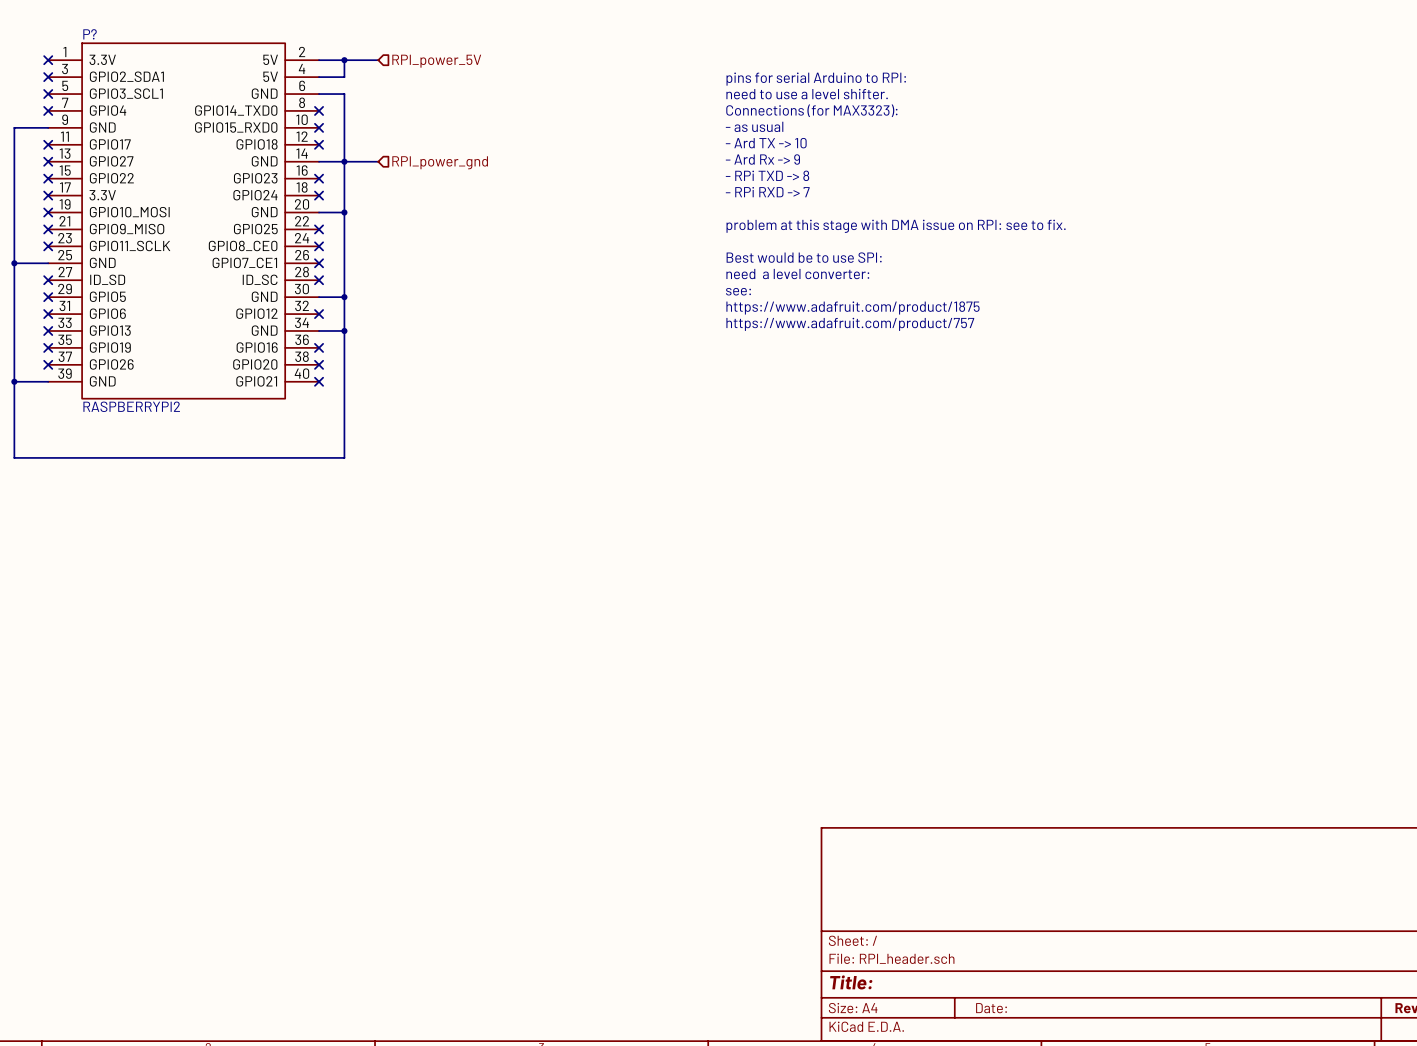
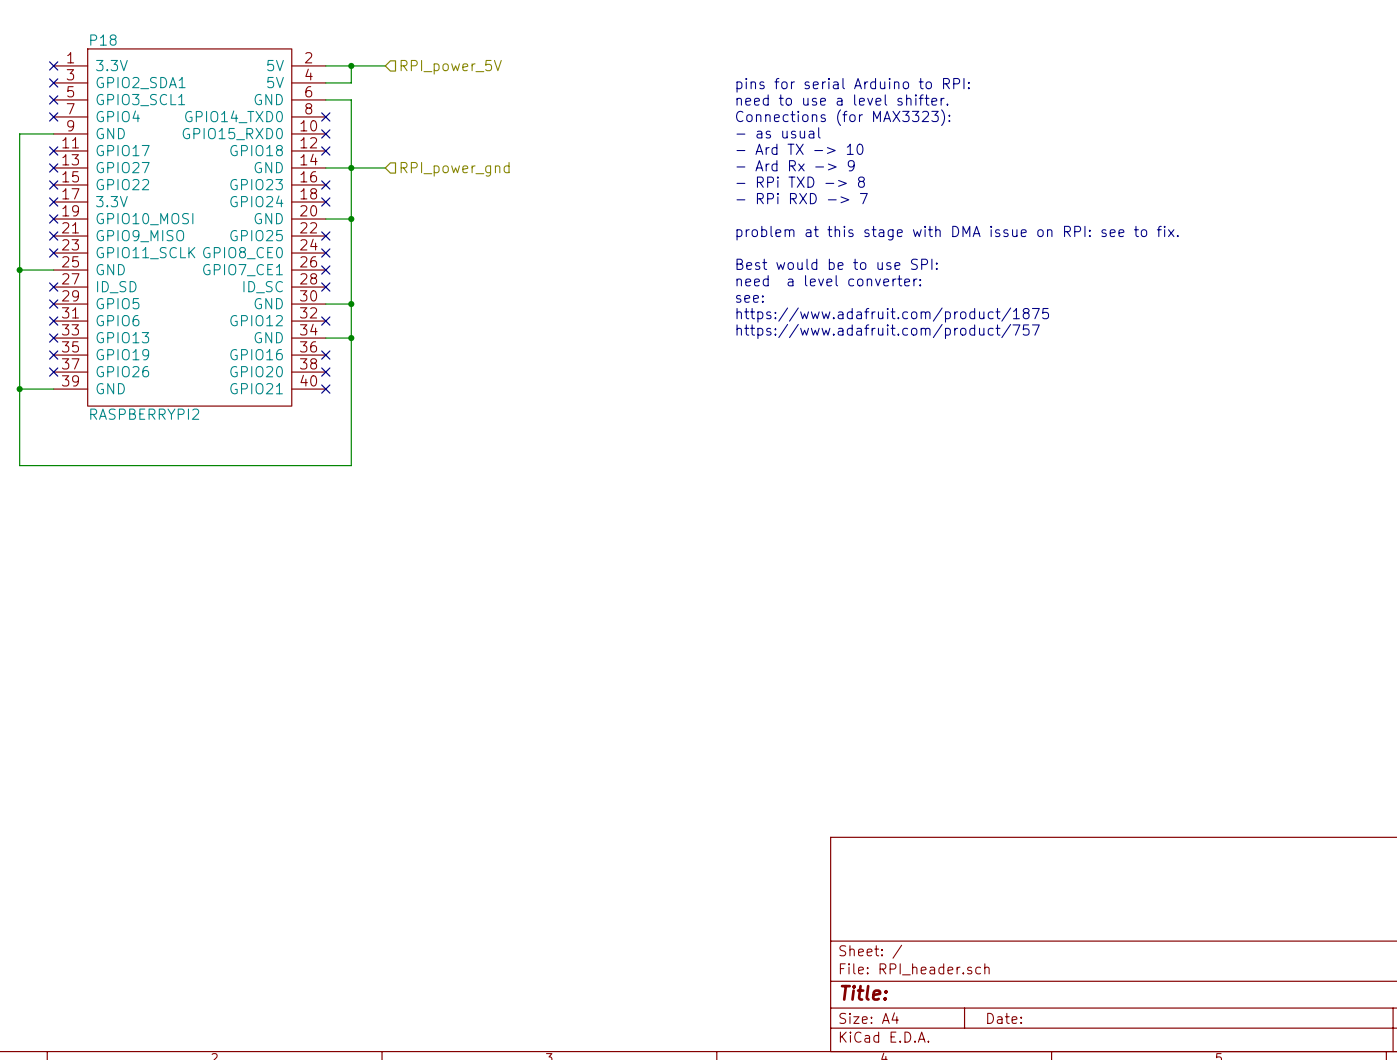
P? name: P? (90, 34) -> P18 (103, 40)

